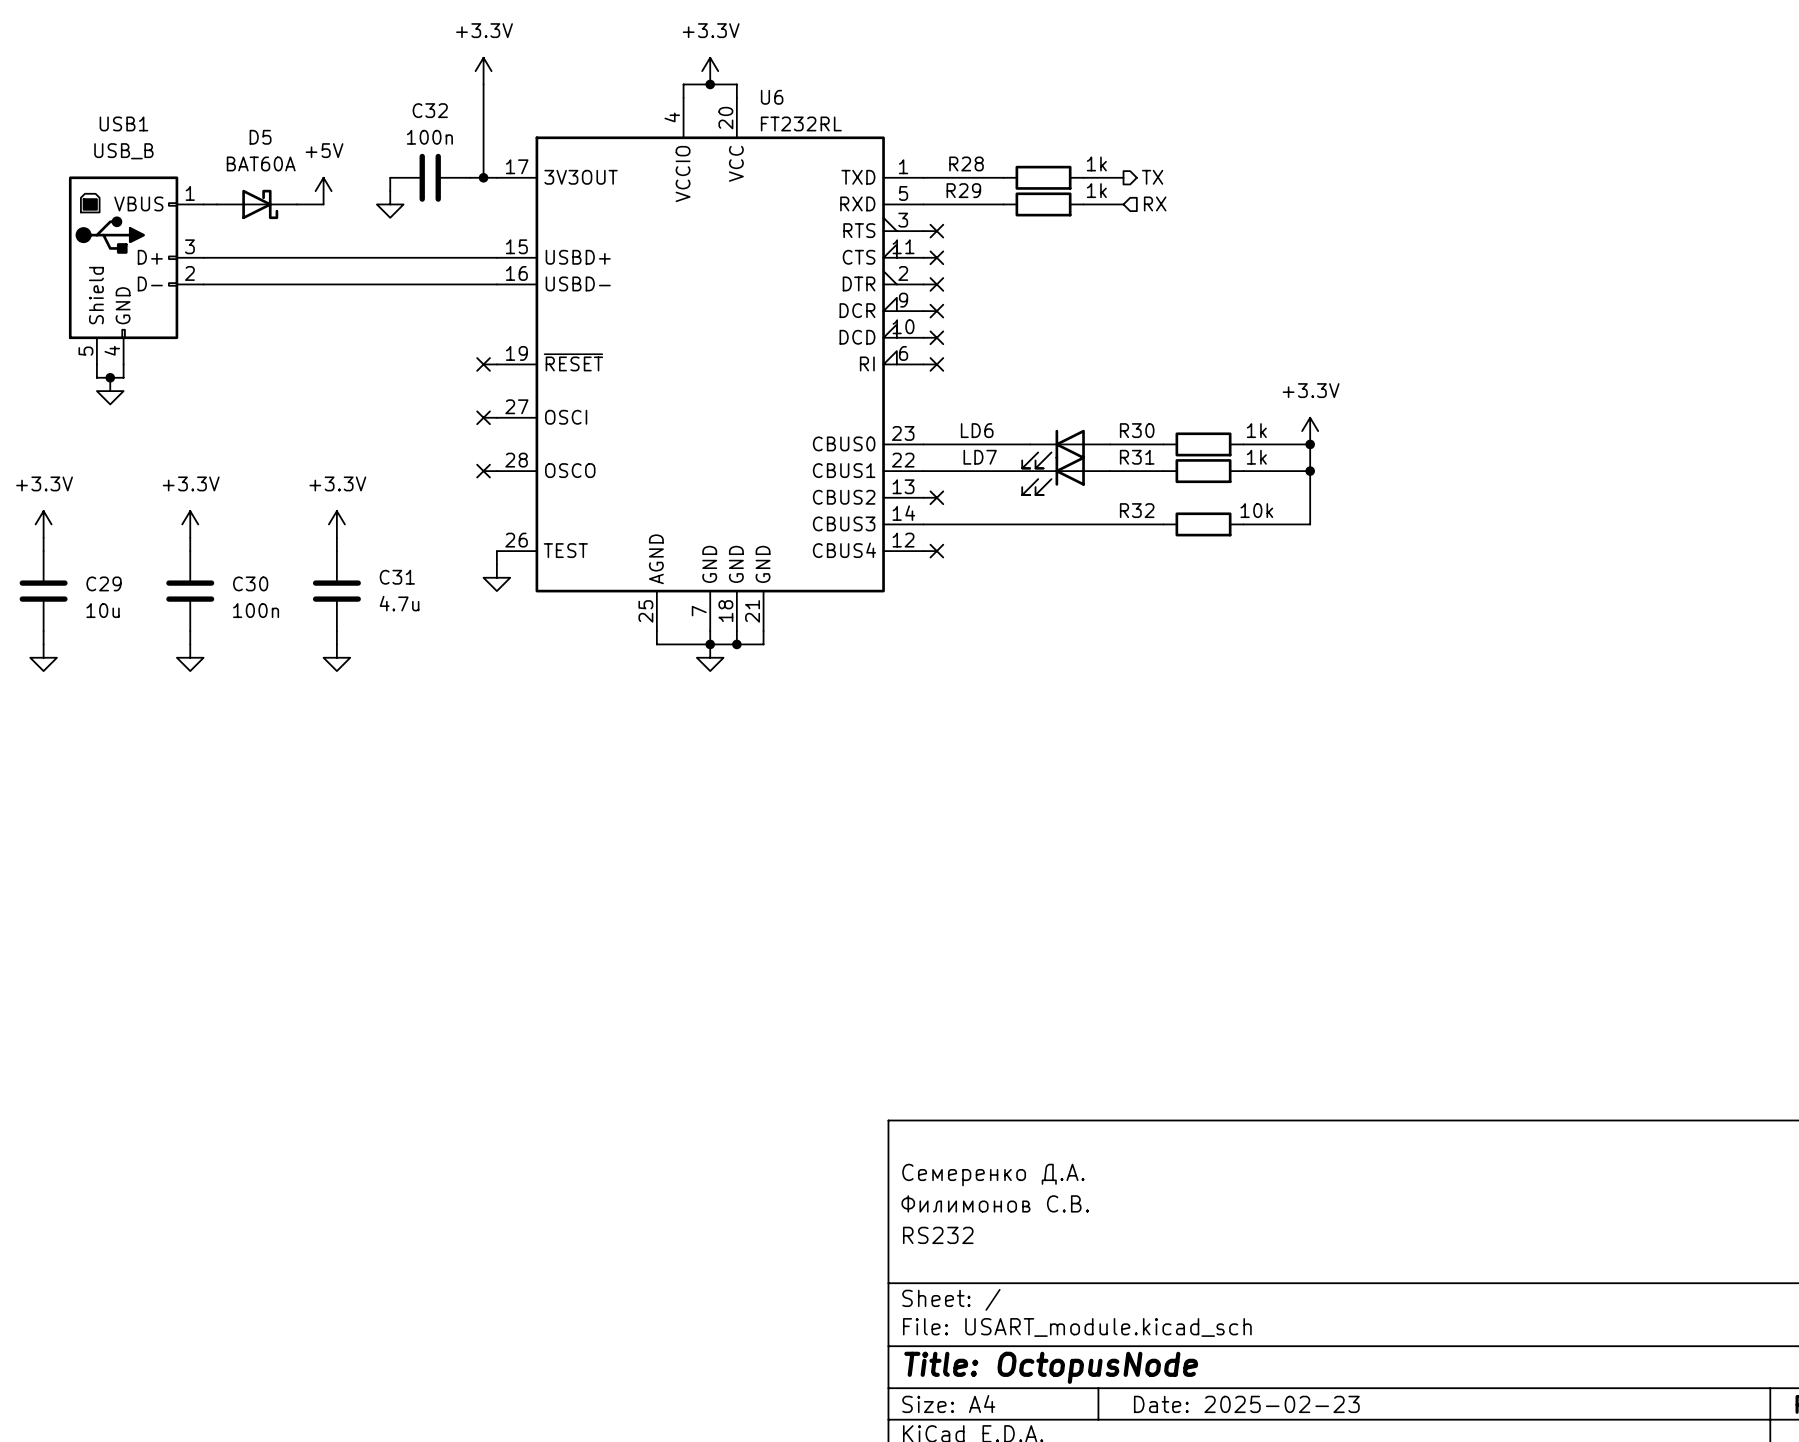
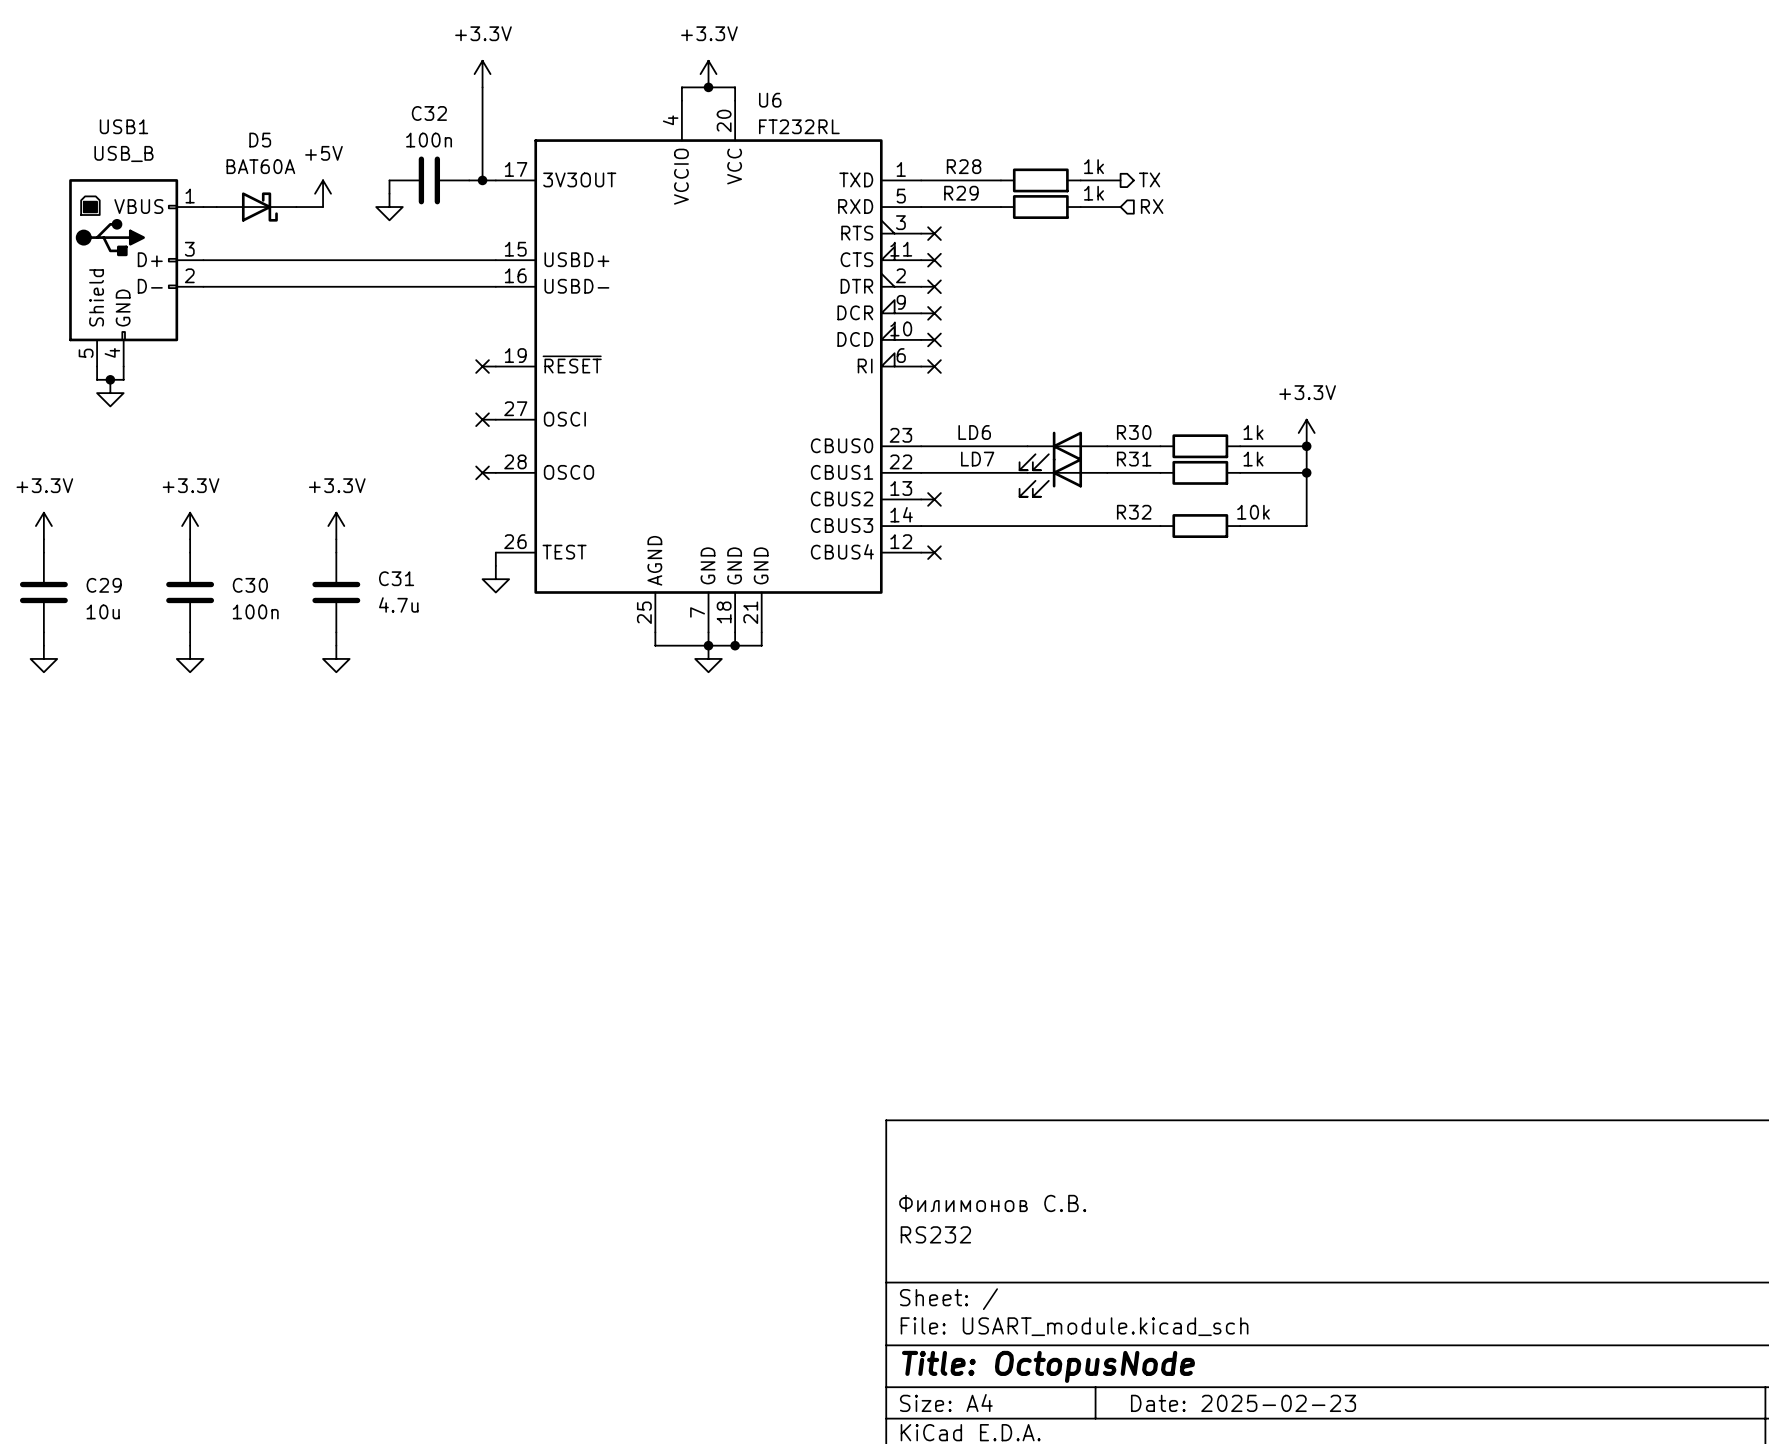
title block: Семеренко Д.А. (993, 1175) -> none

